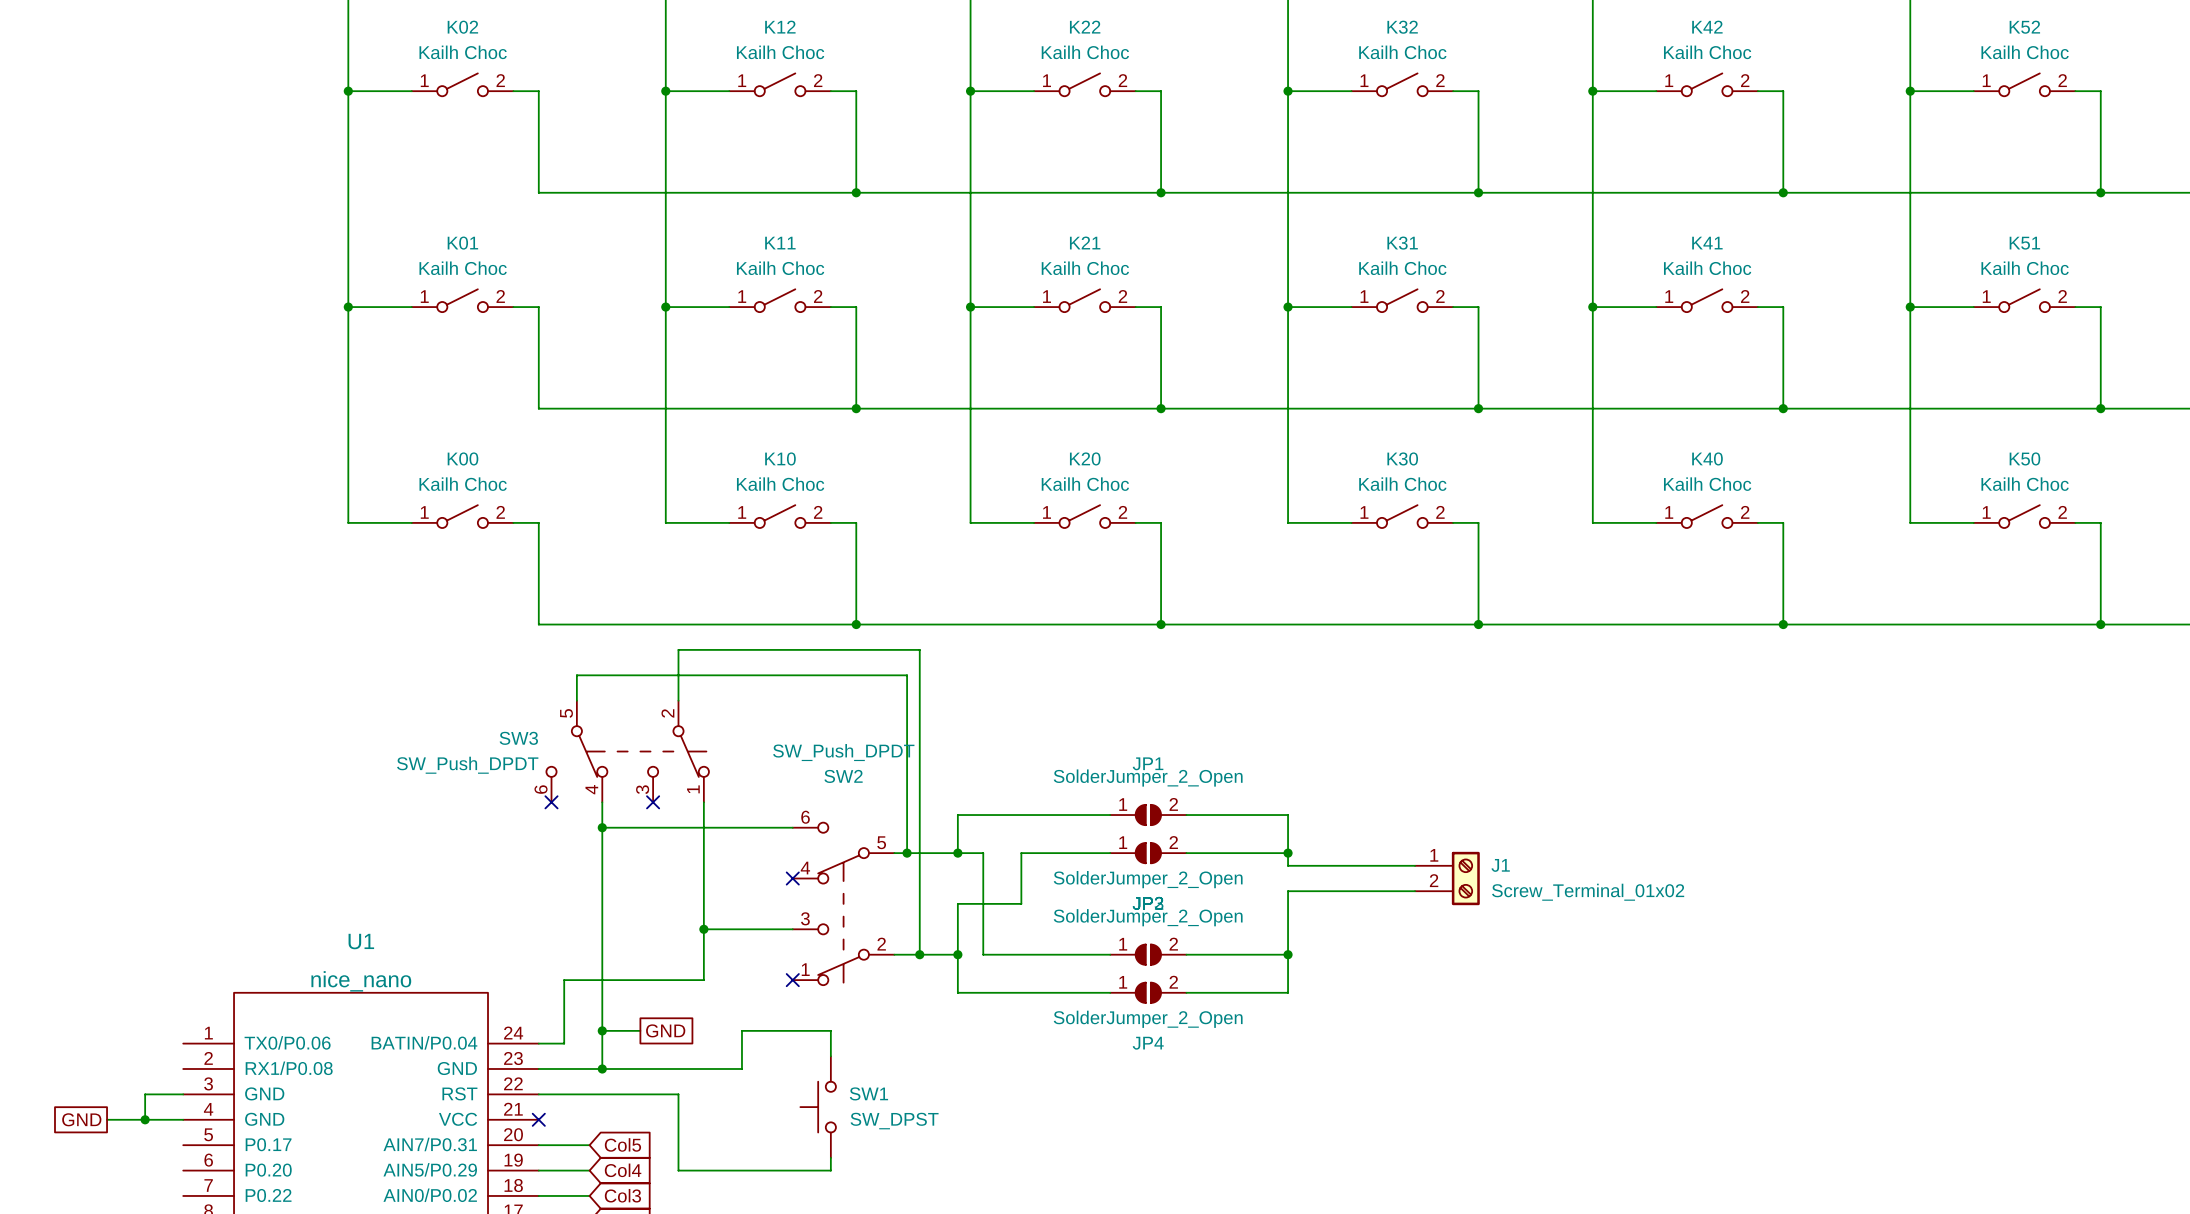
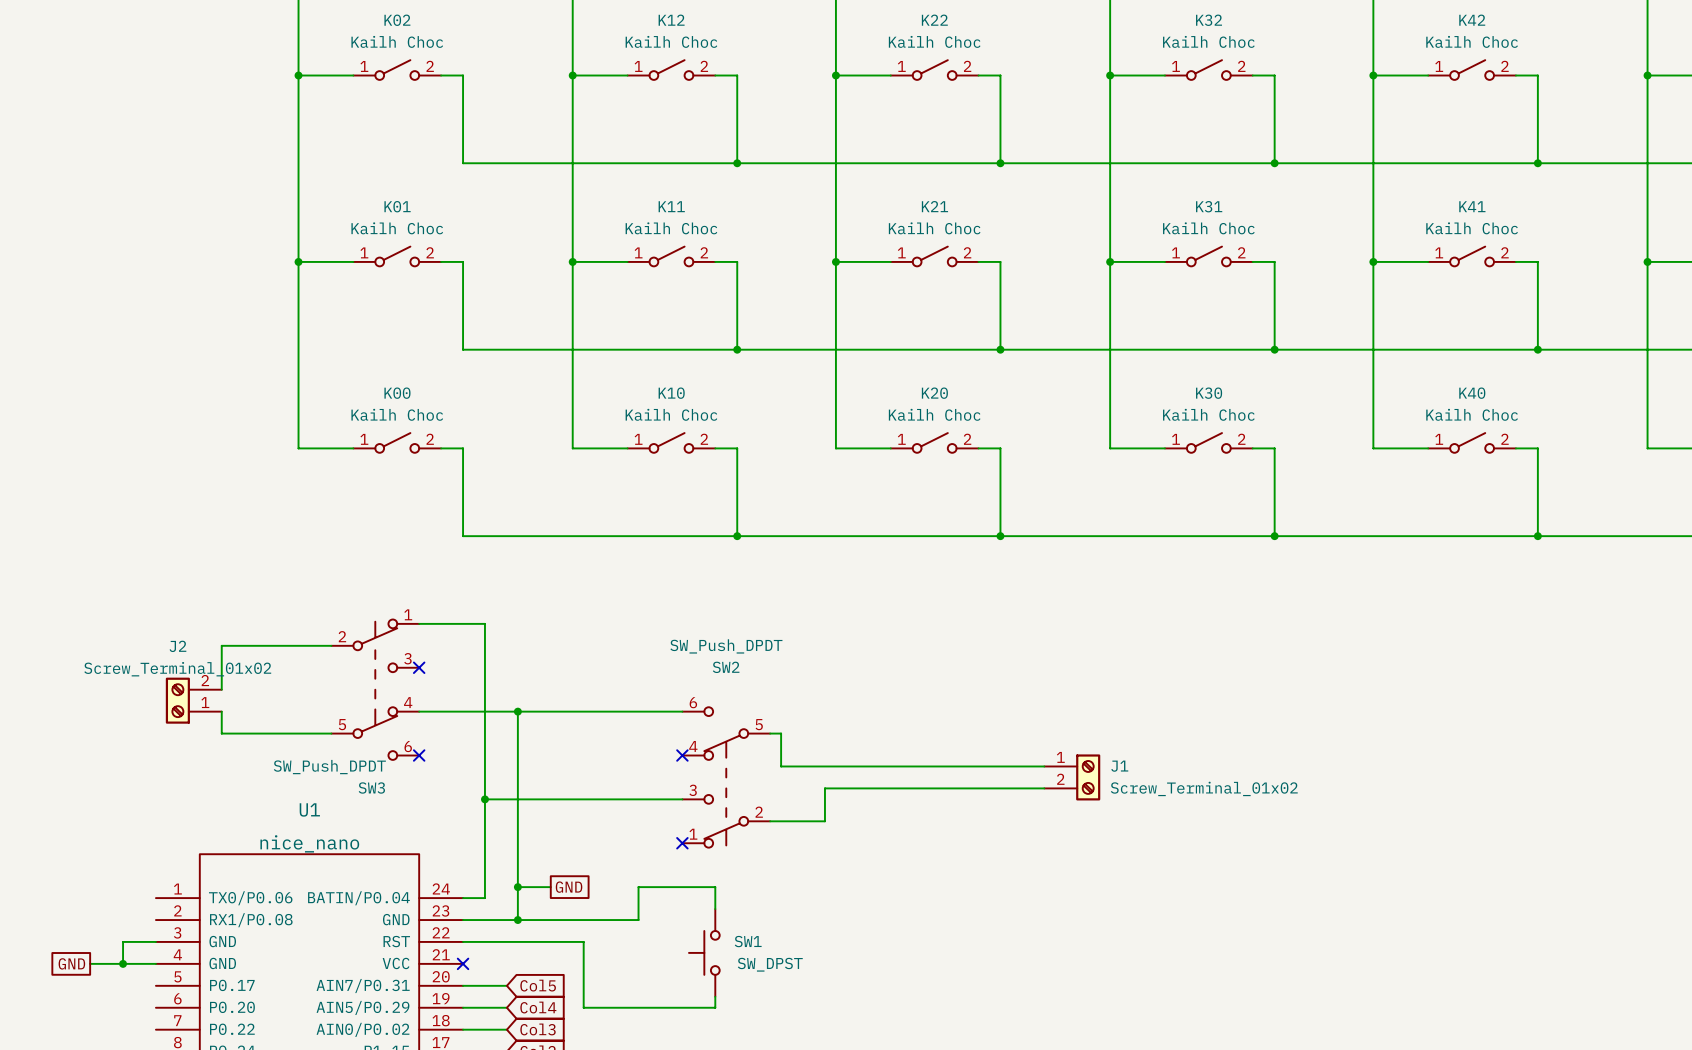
wire: (576, 700) (576, 675) (907, 675) (907, 853) (983, 853) (983, 954) (1110, 954) -> none
wire: (678, 700) (678, 649) (919, 649) (919, 954) -> none
wire: none -> (331, 645) (221, 645) (221, 689)
SW3 rotation: 0° (627, 751) -> 90° counterclockwise (375, 689)
SW3 position: (627, 751) -> (375, 689)
SW3 value position: SW_Push_DPDT (467, 765) -> SW_Push_DPDT (329, 767)
no-connect mark: none -> (419, 667)
no-connect mark: (551, 802) -> none
wire: (602, 802) (602, 827) -> (419, 711) (517, 711)
no-connect mark: (653, 802) -> none
wire: (703, 802) (703, 980) (564, 980) -> (419, 623) (484, 623) (484, 843)
J2: none -> Screw_Terminal_01x02 (193, 700)
wire: (1110, 815) (957, 815) (957, 853) -> none
JP1: SolderJumper_2_Open (1148, 815) -> none
wire: (1186, 815) (1288, 815) (1288, 865) (1415, 865) -> none
wire: none -> (221, 711) (221, 733) (331, 733)
wire: none -> (781, 733) (781, 766) (1044, 766)
junction: (907, 853) -> none
junction: (957, 853) -> none
wire: (1110, 853) (1021, 853) (1021, 903) (957, 903) (957, 916) -> (1044, 788) (824, 788)
part: SolderJumper_2_Open (1148, 853) -> none
wire: (1186, 853) (1288, 853) -> none
junction: (1288, 853) -> none
no-connect mark: none -> (419, 755)
J1 position: (1447, 878) -> (1072, 777)
wire: (1415, 891) (1288, 891) (1288, 992) (1186, 992) -> none
wire: none -> (484, 799) (605, 799)
junction: none -> (484, 799)
junction: (703, 929) -> none
junction: (919, 954) -> none
wire: (957, 954) (957, 992) (1110, 992) -> none
junction: (957, 954) -> none
part: SolderJumper_2_Open (1148, 954) -> none
wire: (1186, 954) (1288, 954) -> none
junction: (1288, 954) -> none
JP4: SolderJumper_2_Open (1148, 992) -> none

